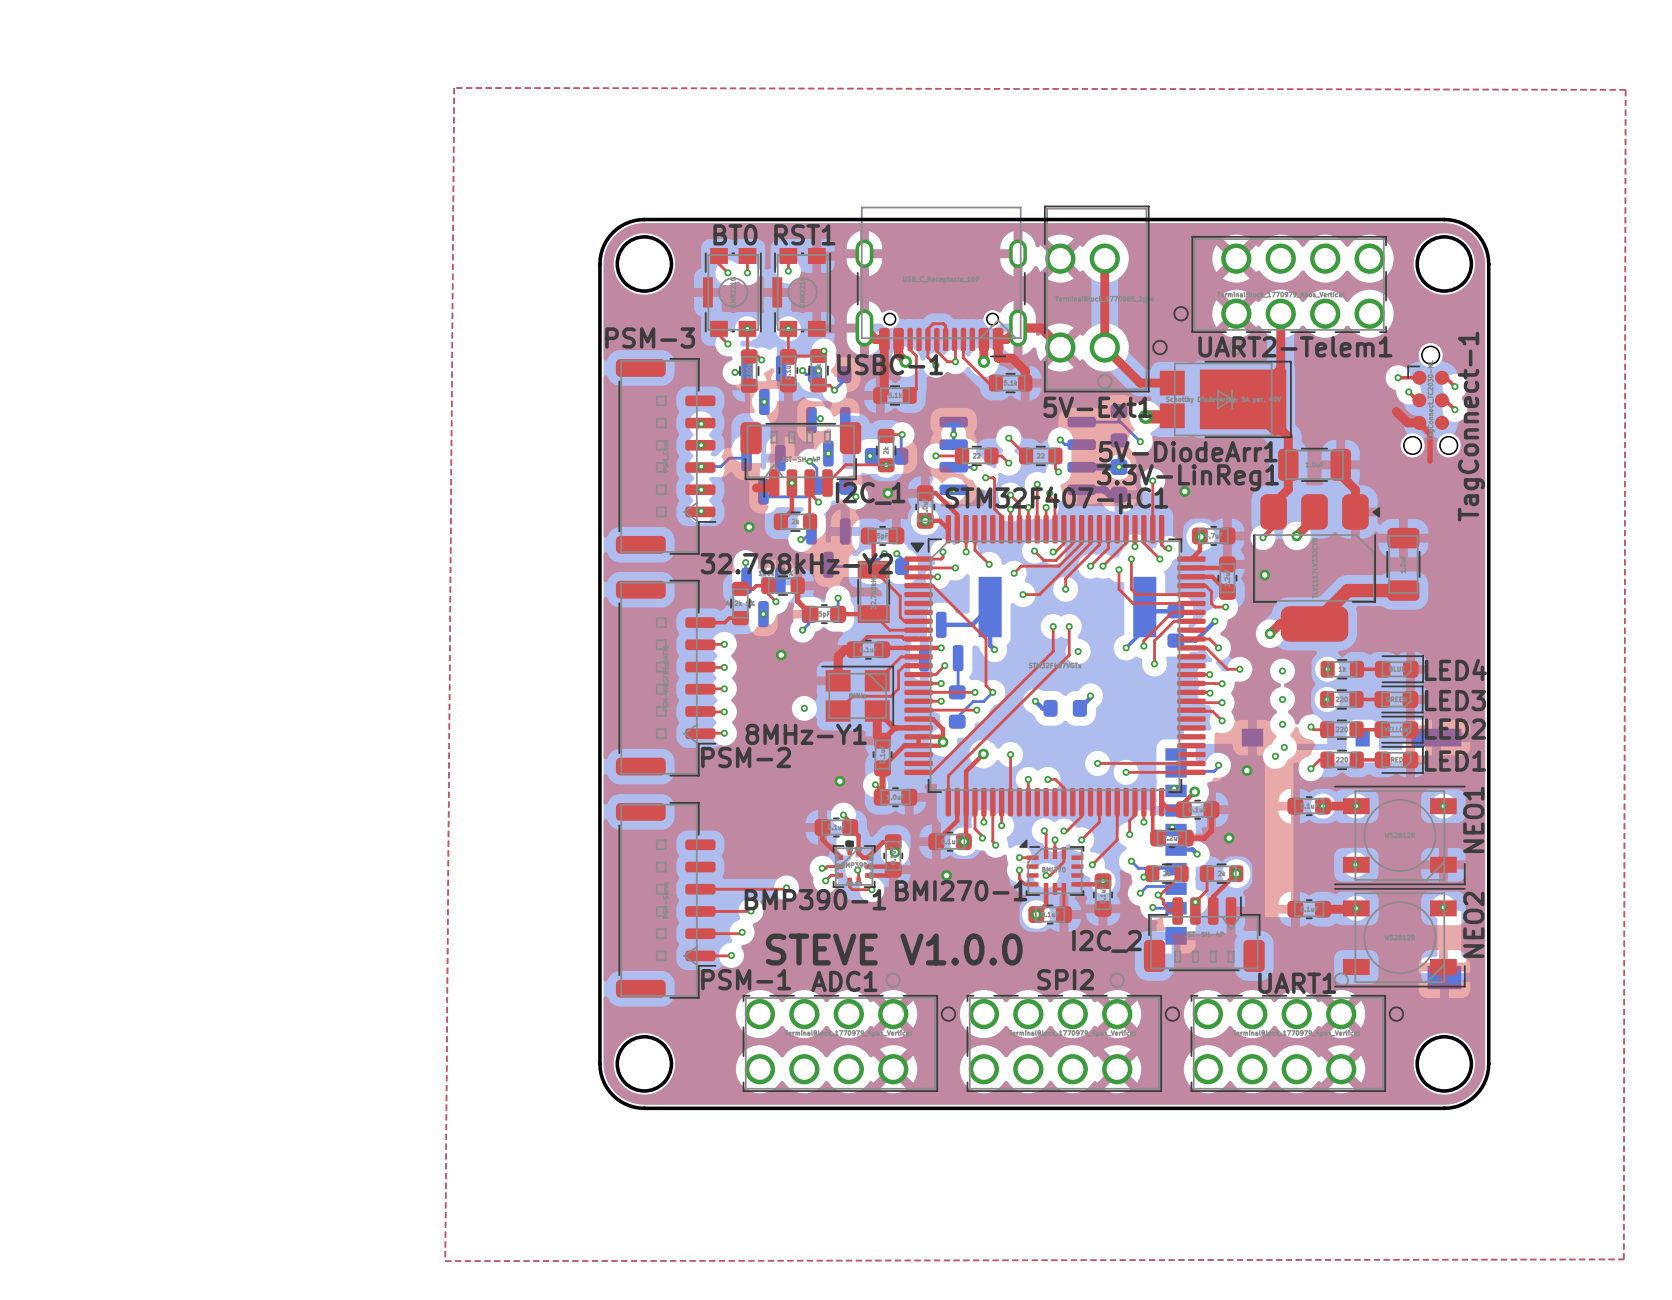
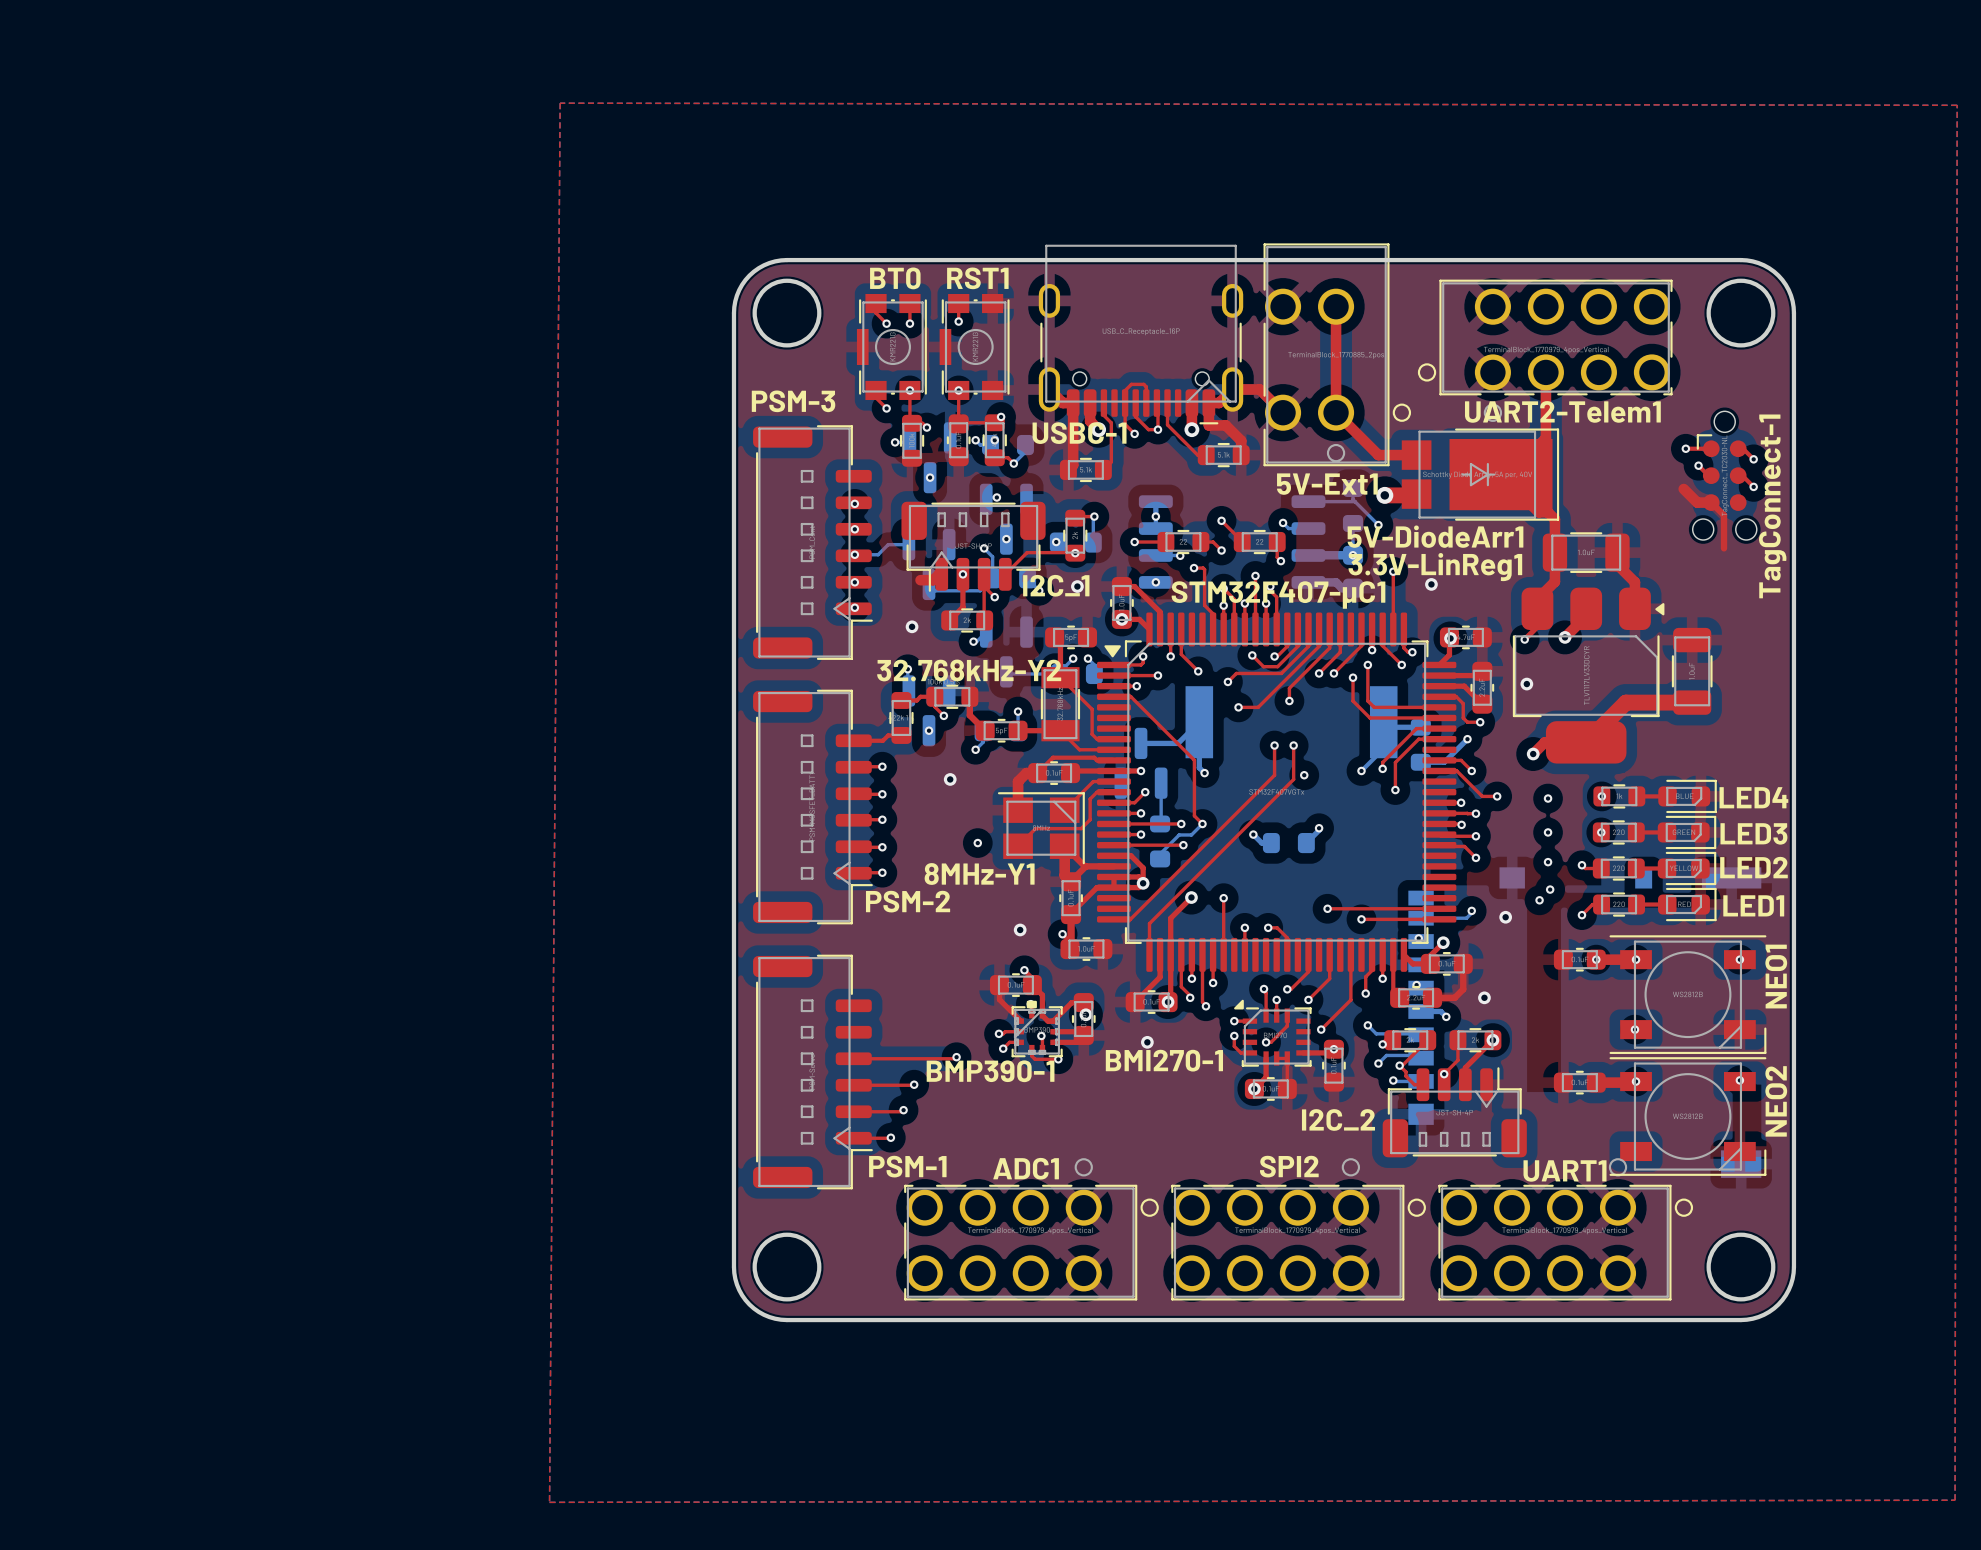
text: STEVE V1.0.0 (894, 949) -> none

